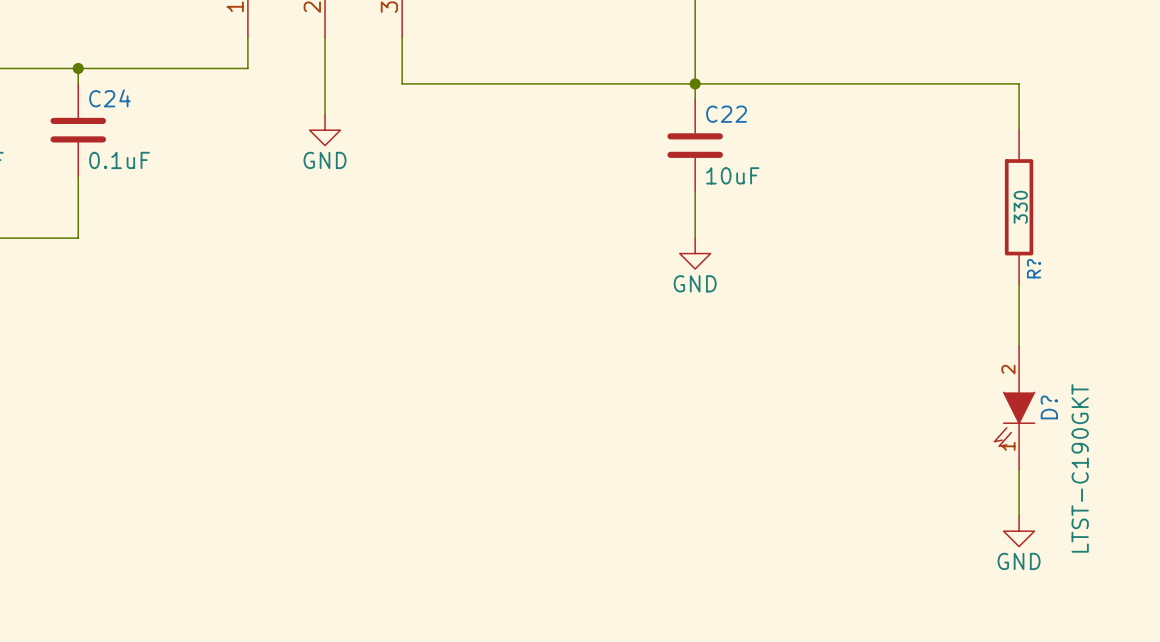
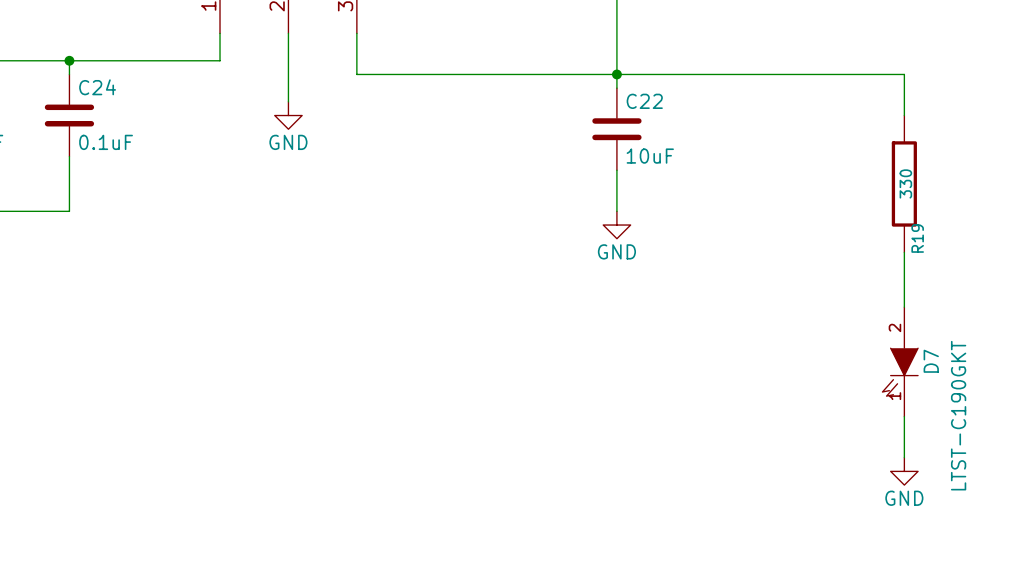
R? name: R? (1034, 268) -> R19 (917, 238)
D? name: D? (1049, 407) -> D7 (931, 361)

